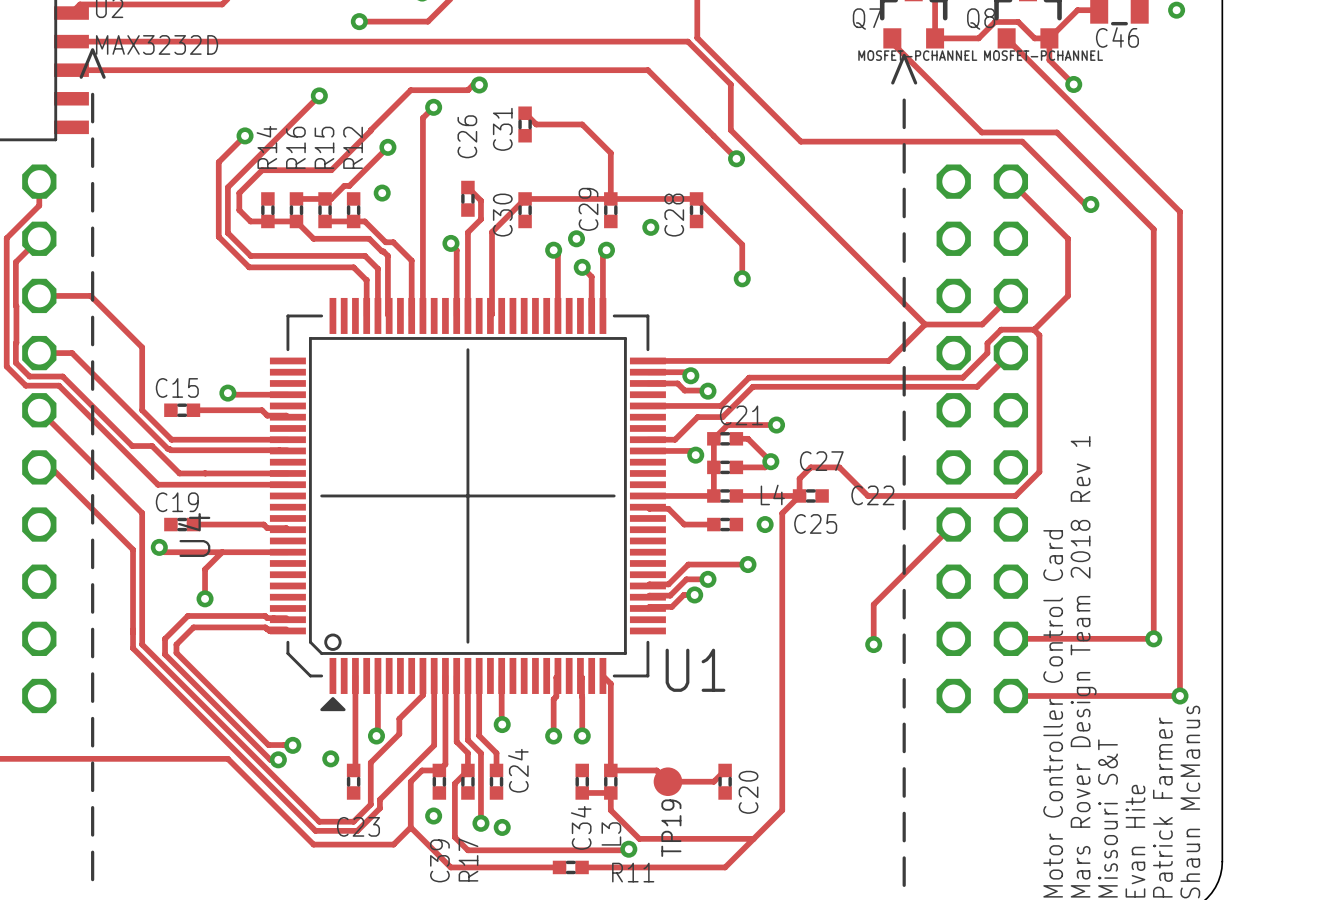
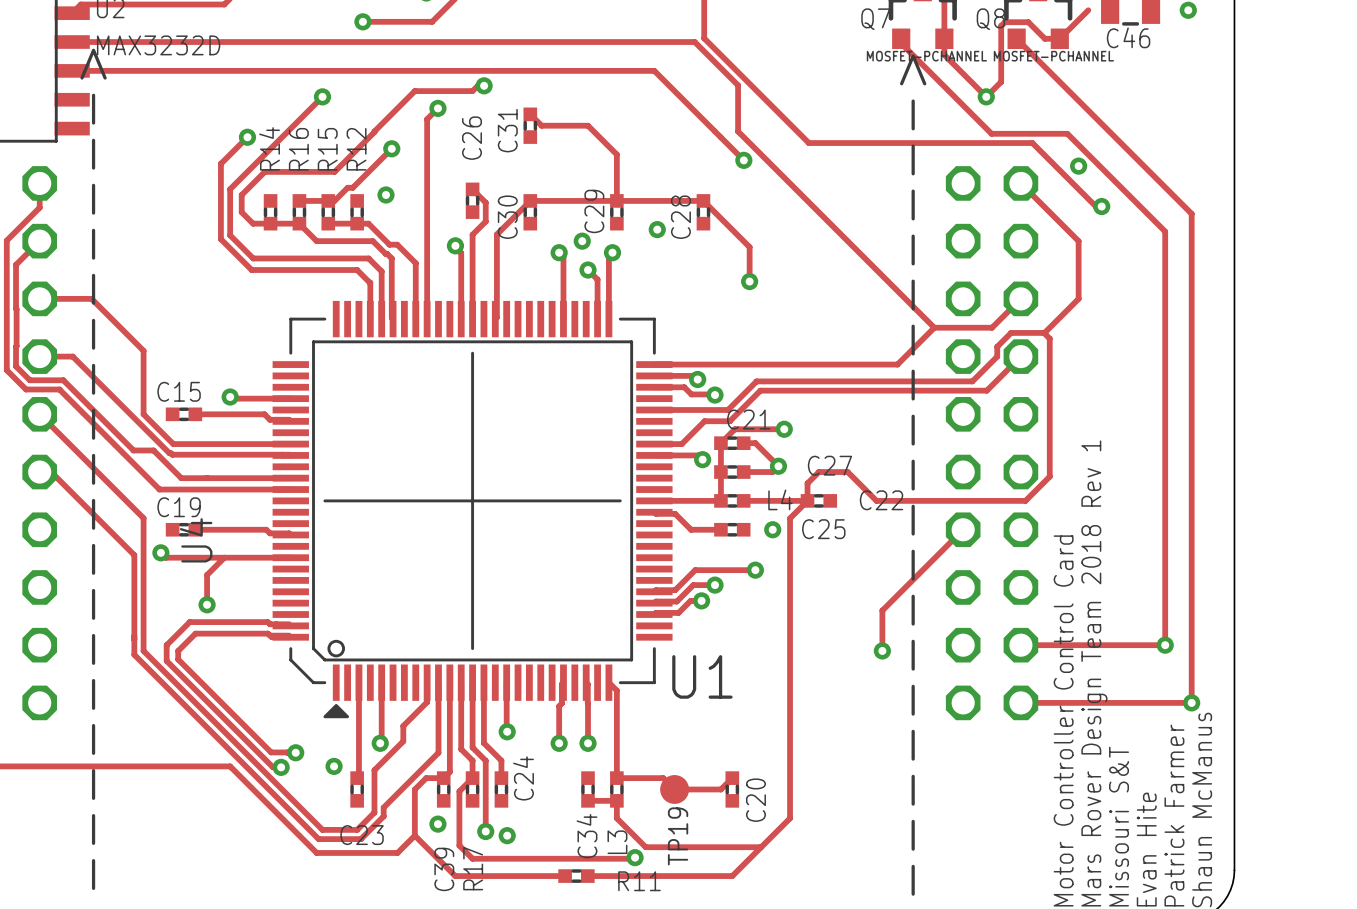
track: (1077, 10) (1099, 10) -> none
track: (991, 25) (978, 38) (935, 38) -> (1001, 25) (1001, 81) (986, 96) (944, 54) (944, 38)
track: (1049, 38) (1049, 60) (1073, 84) -> none
via: (1073, 84) -> none
via: none -> (986, 96)
via: none -> (1078, 166)

